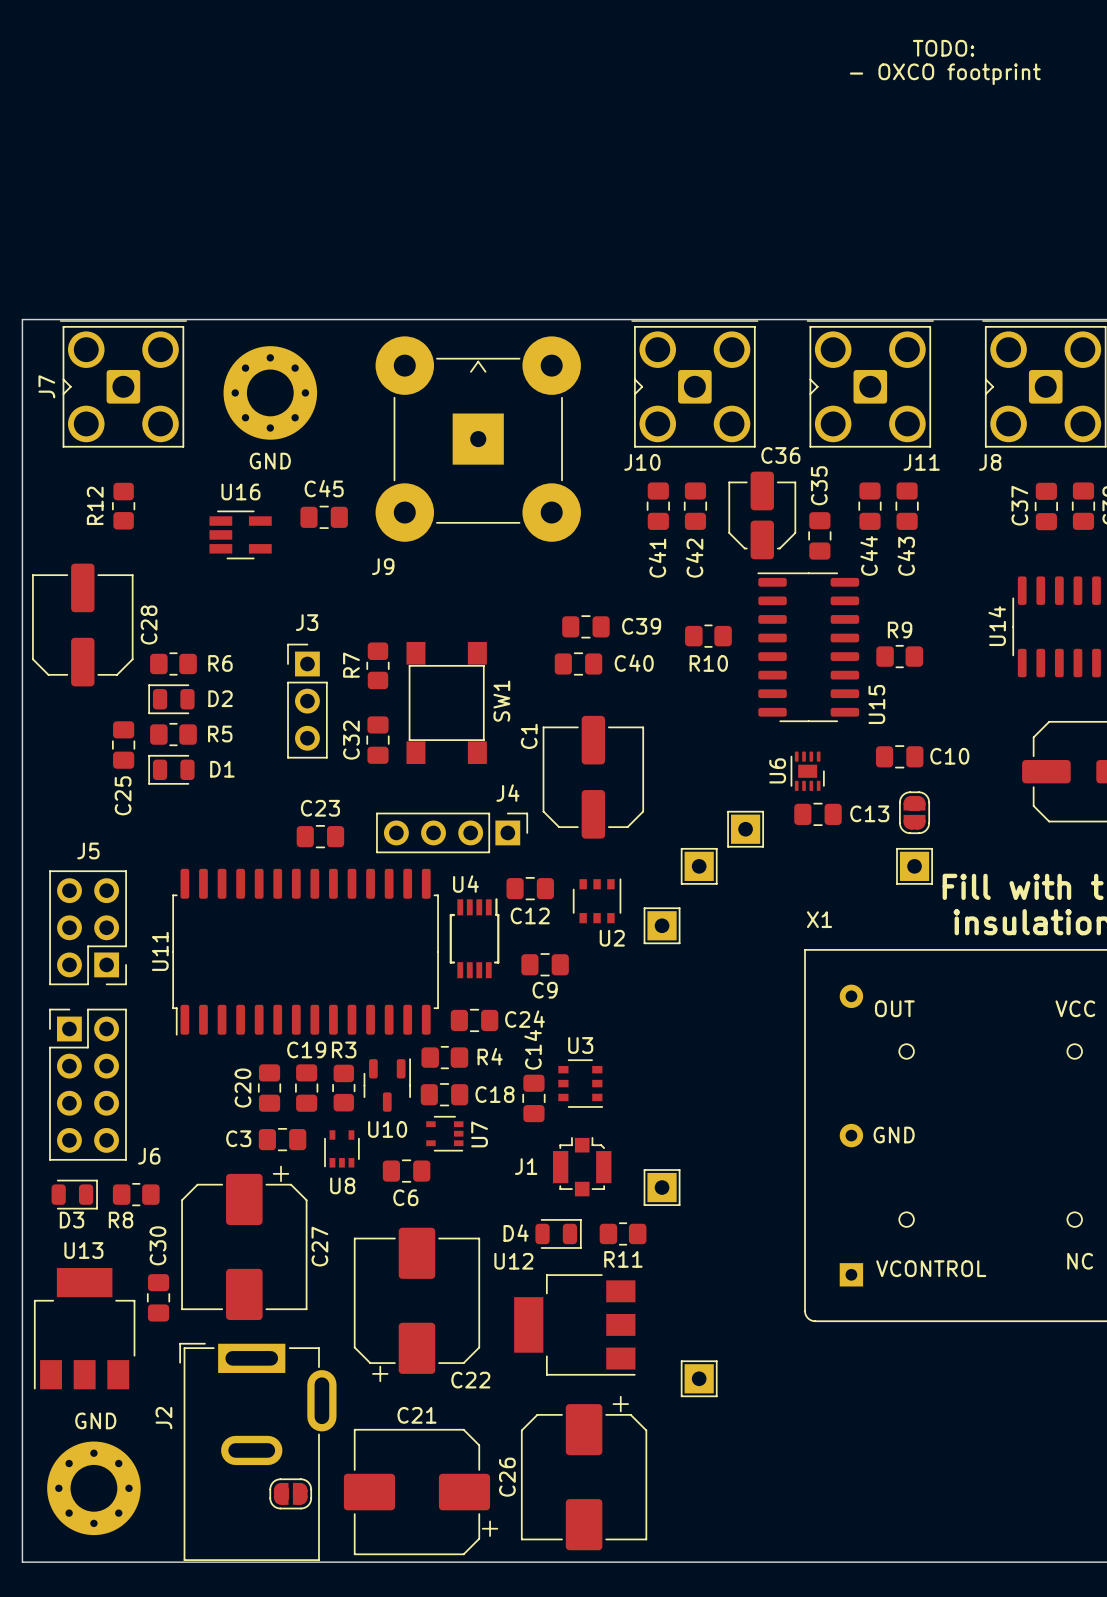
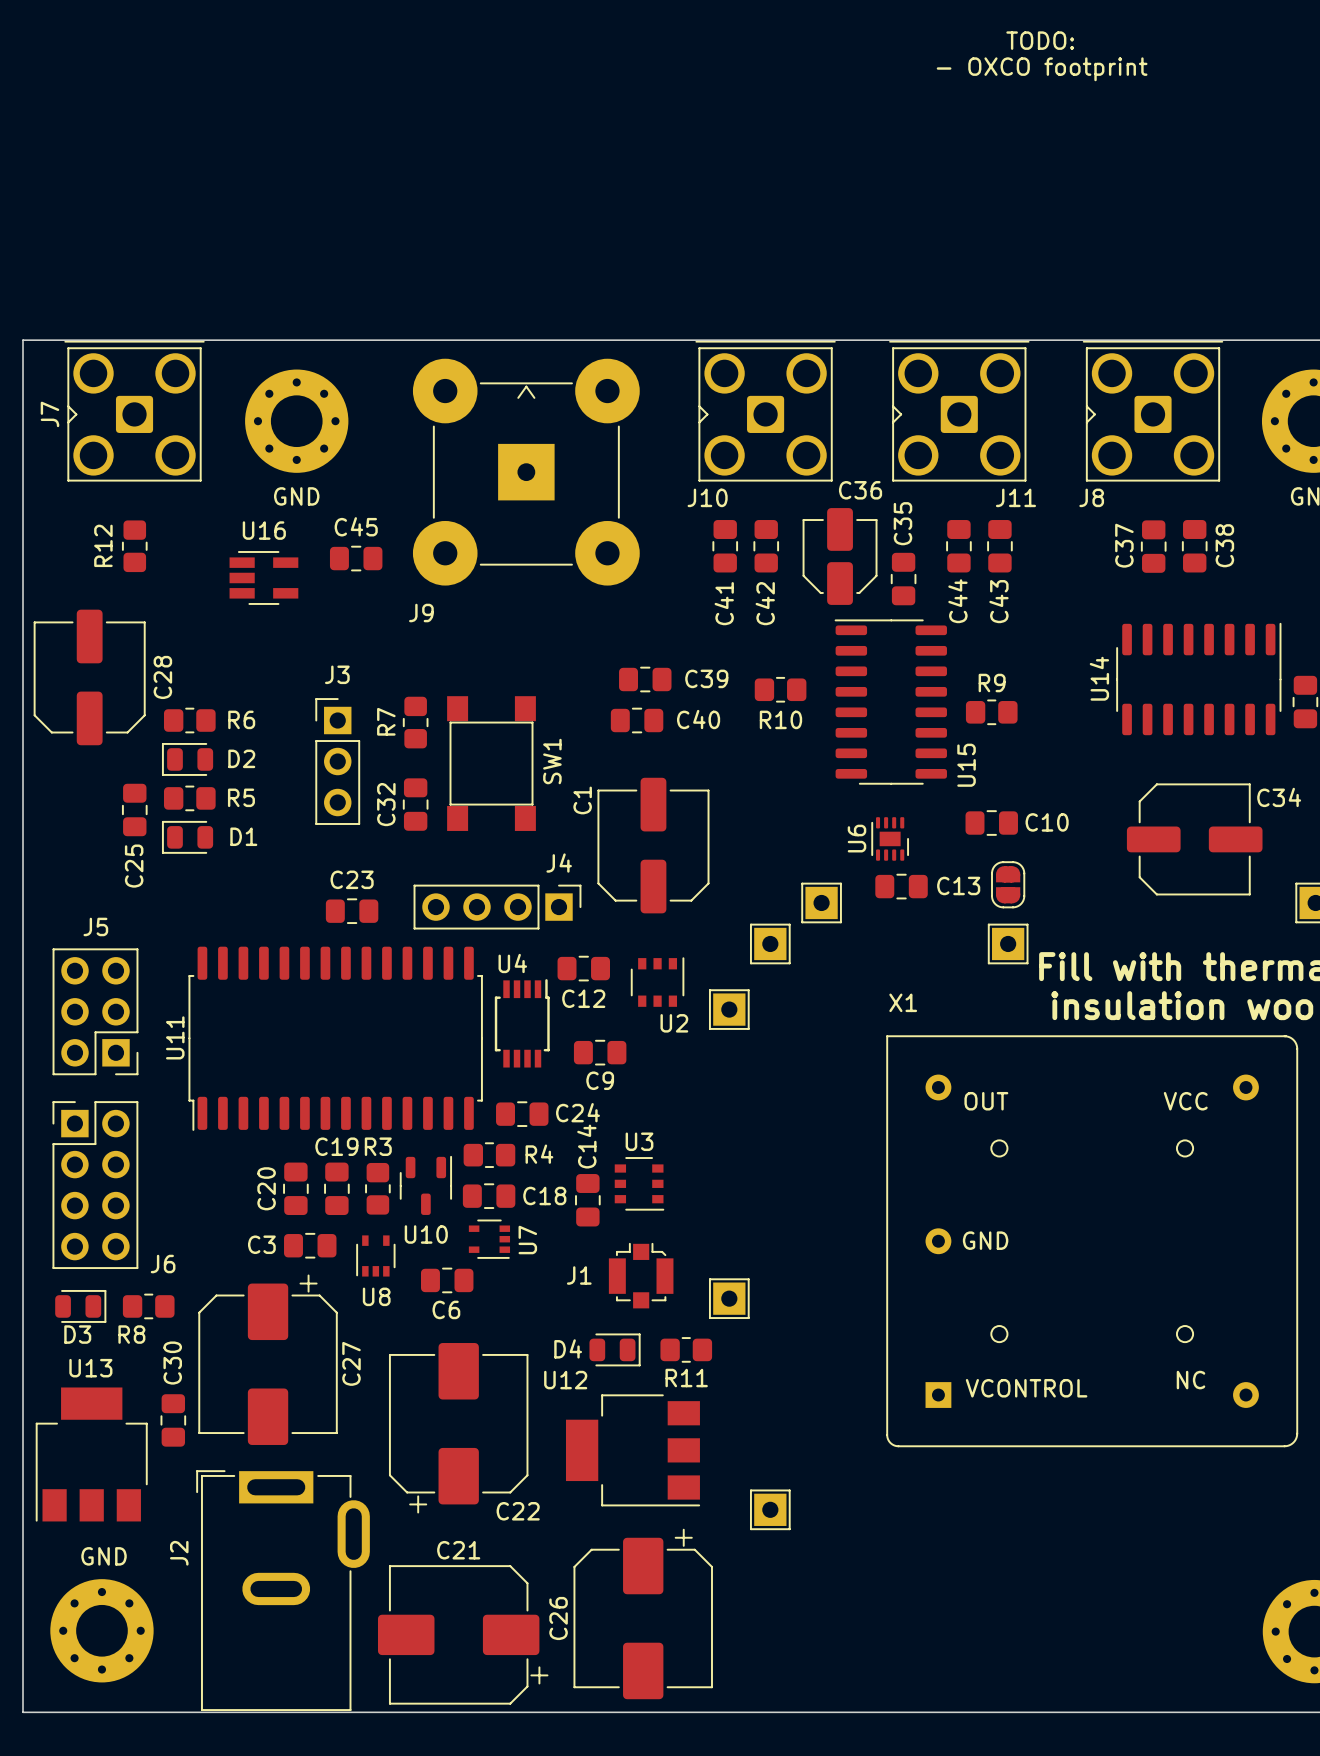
part: (290, 1493) -> none

